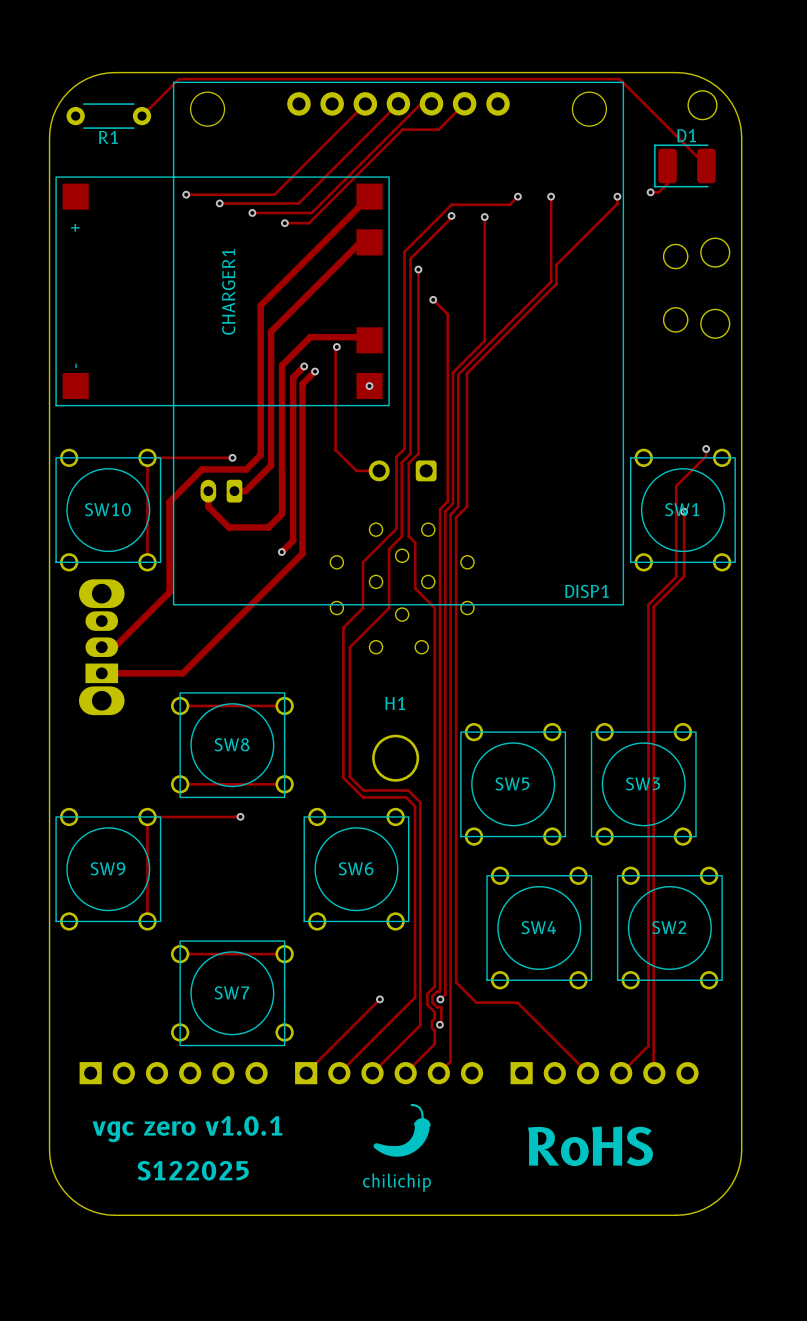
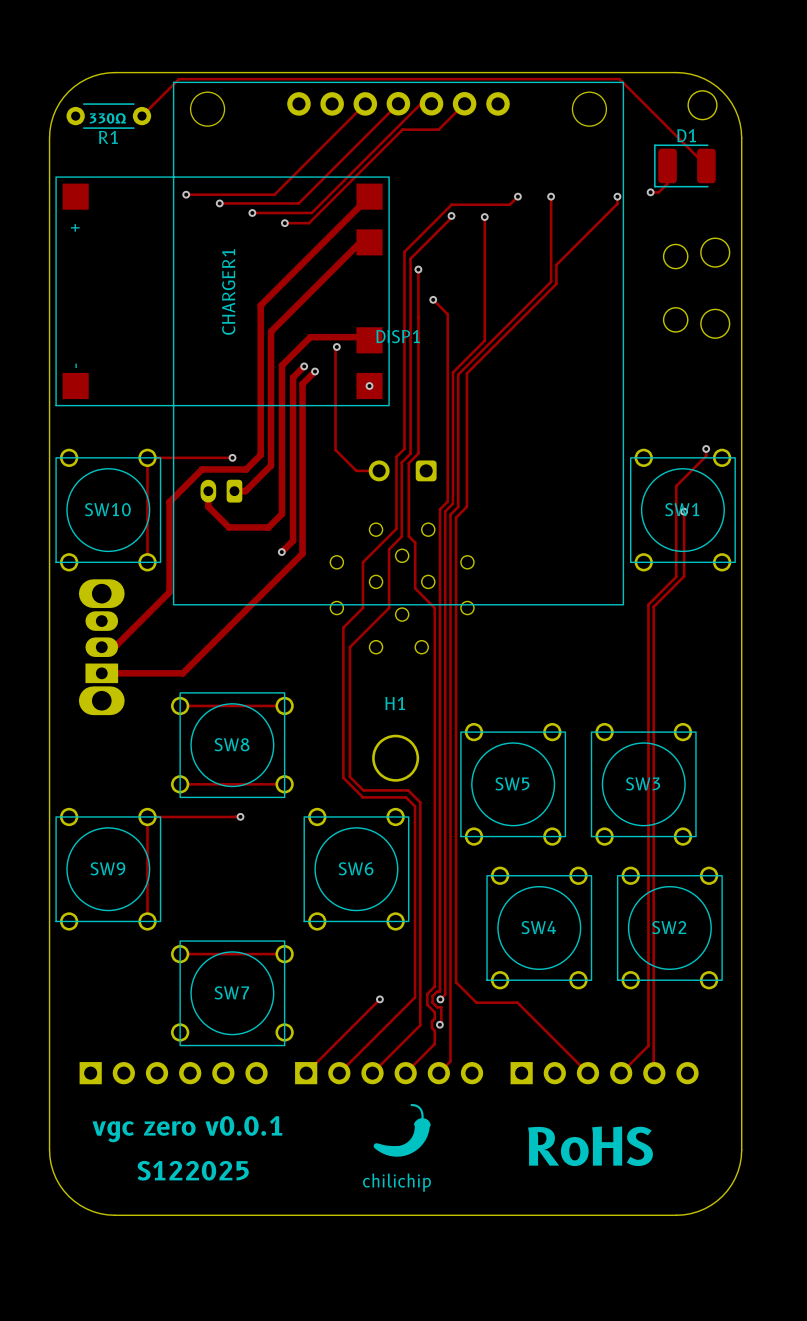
text: none -> 330Ω (107, 118)
DISP1 name position: DISP1 (586, 591) -> DISP1 (398, 336)
text: vgc zero v1.0.1 (187, 1129) -> vgc zero v0.0.1 (187, 1129)

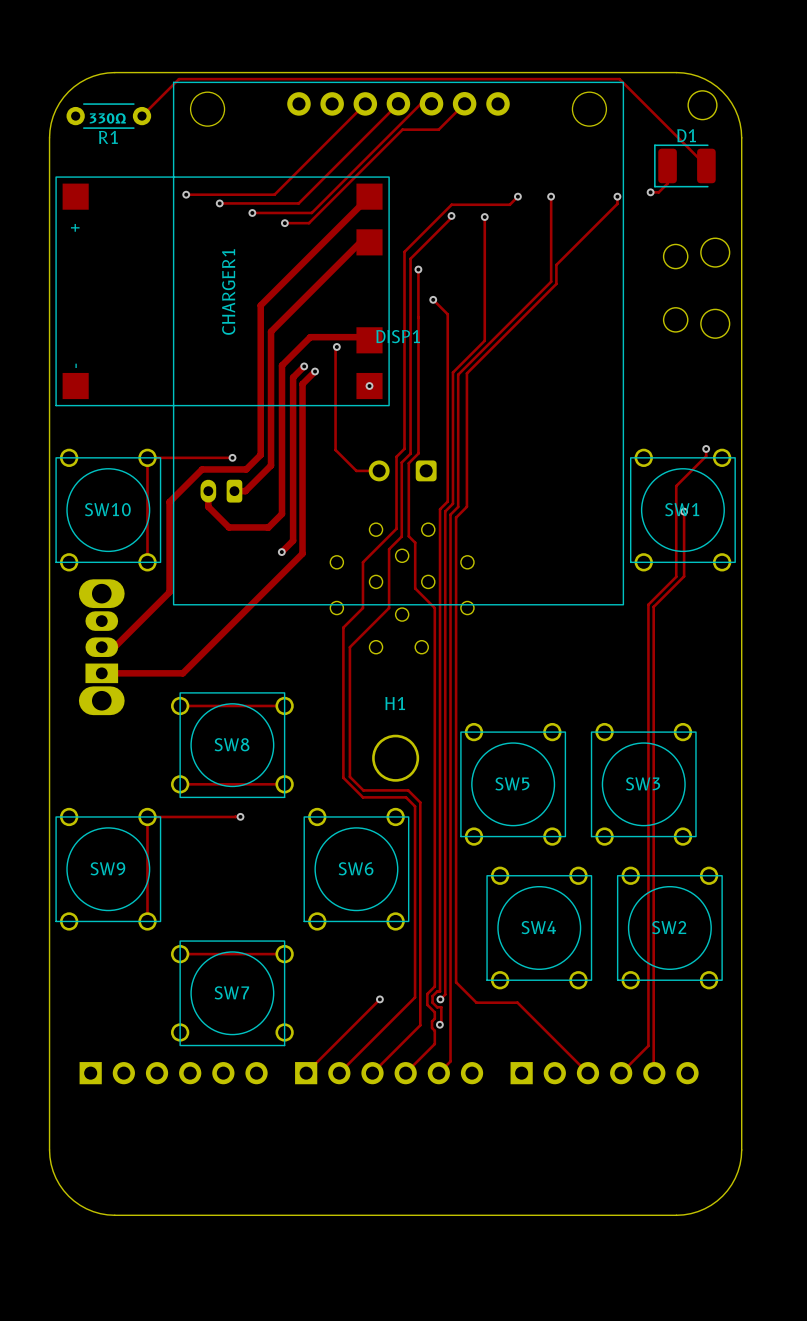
drawing: [373, 1103, 431, 1157] -> none
text: vgc zero v0.0.1 (187, 1129) -> none
text: RoHS (590, 1146) -> none
text: S122025 (193, 1170) -> none
text: chilichip (396, 1182) -> none

